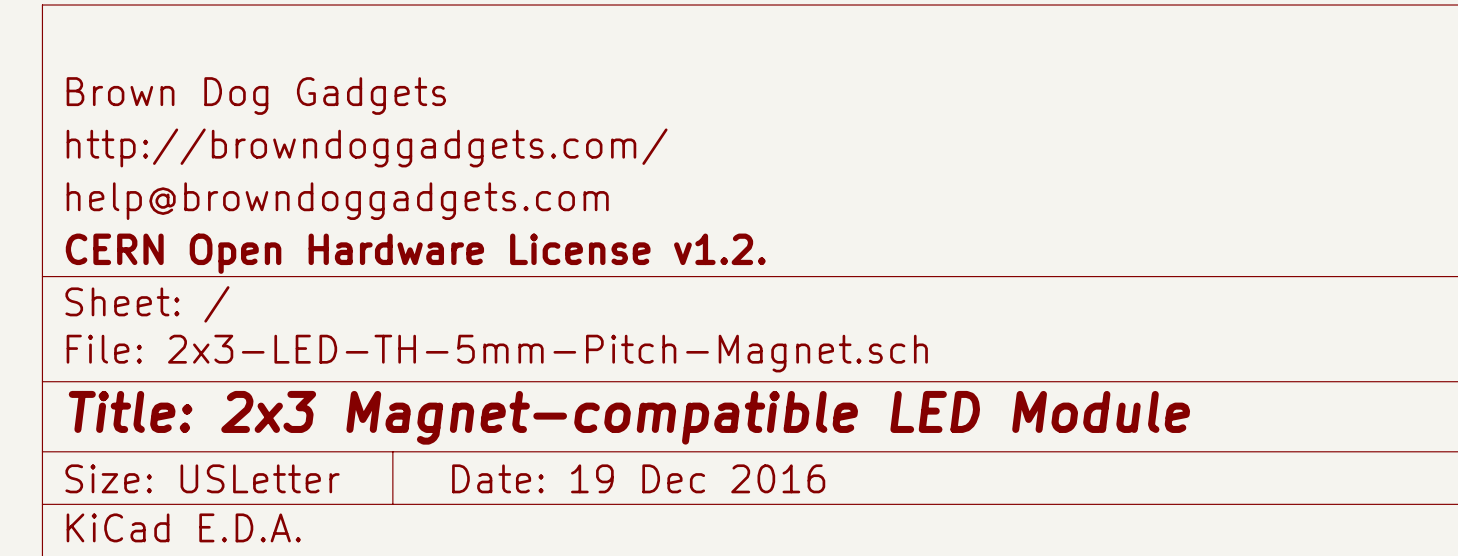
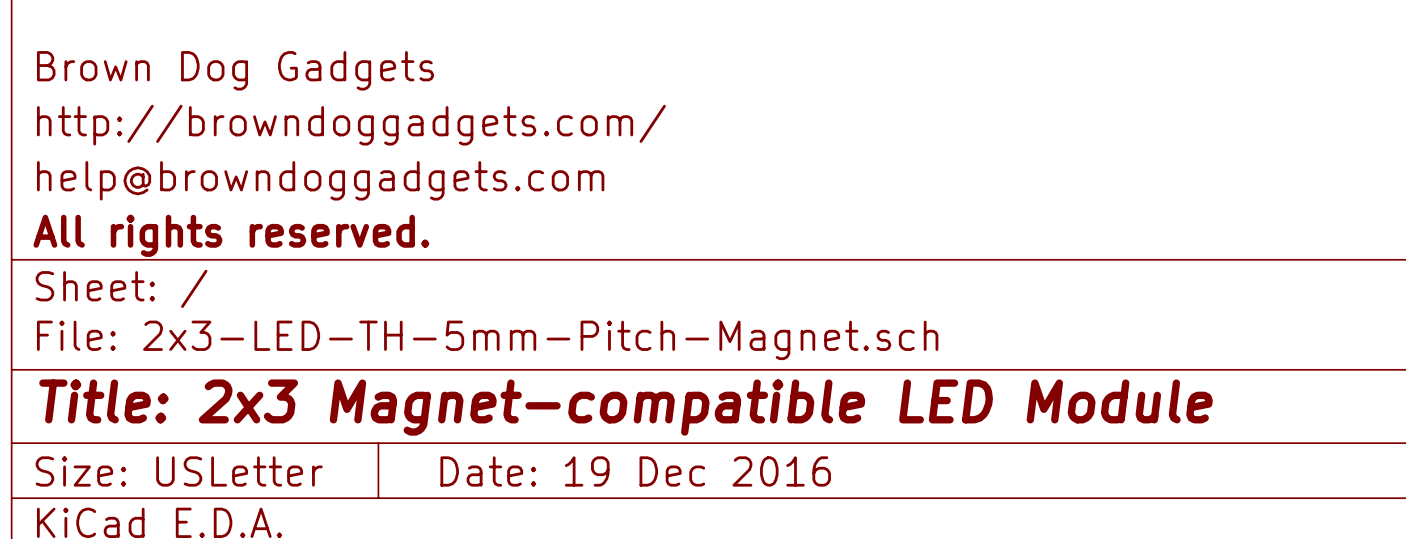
title block: CERN Open Hardware License v1.2. (415, 253) -> All rights reserved. (231, 235)

